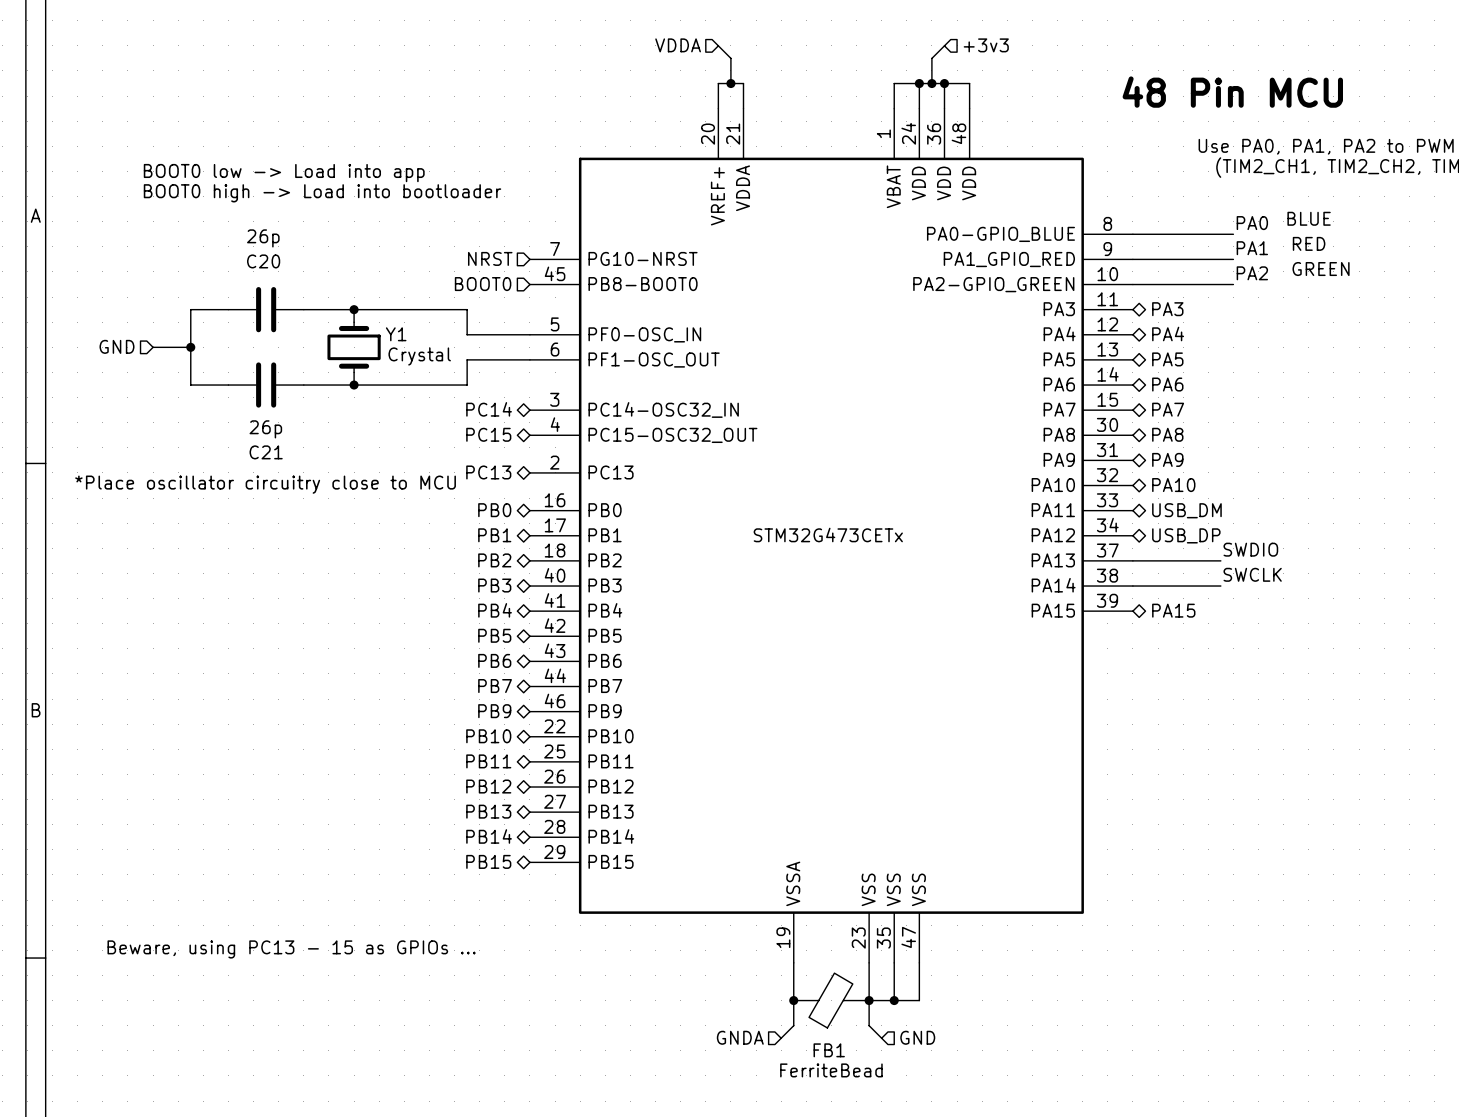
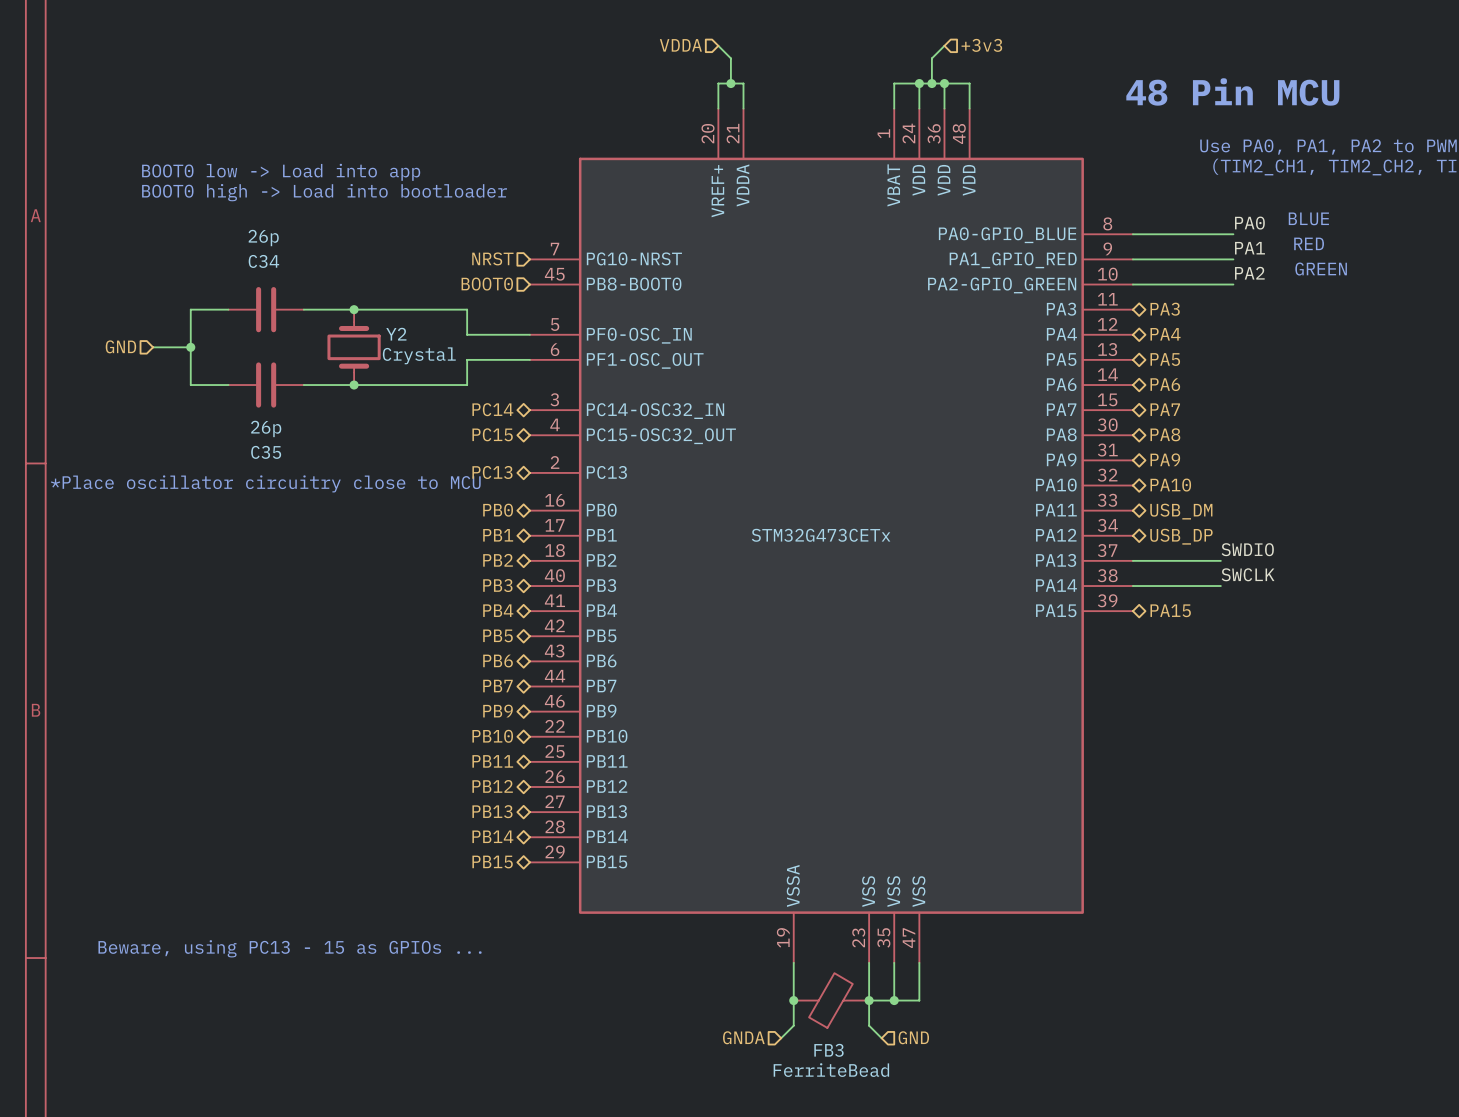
C20 name: C20 (263, 261) -> C34 (263, 261)
Y1 name: Y1 (396, 334) -> Y2 (396, 334)
C21 name: C21 (266, 452) -> C35 (266, 452)
FB1 name: FB1 (829, 1050) -> FB3 (828, 1050)

